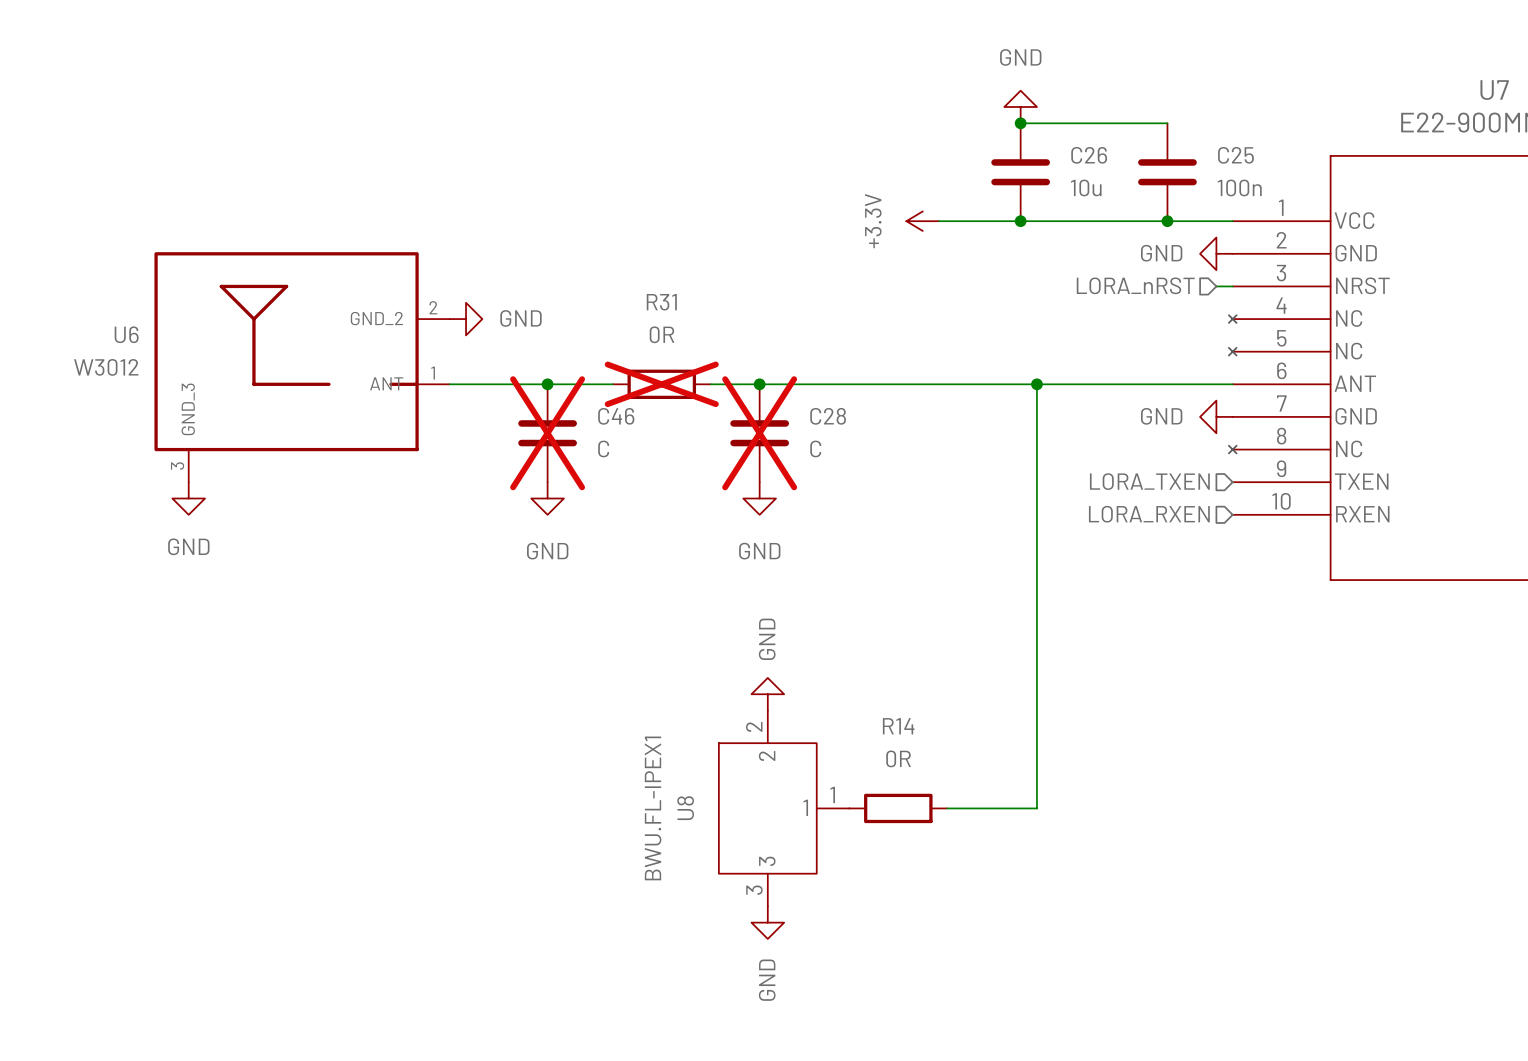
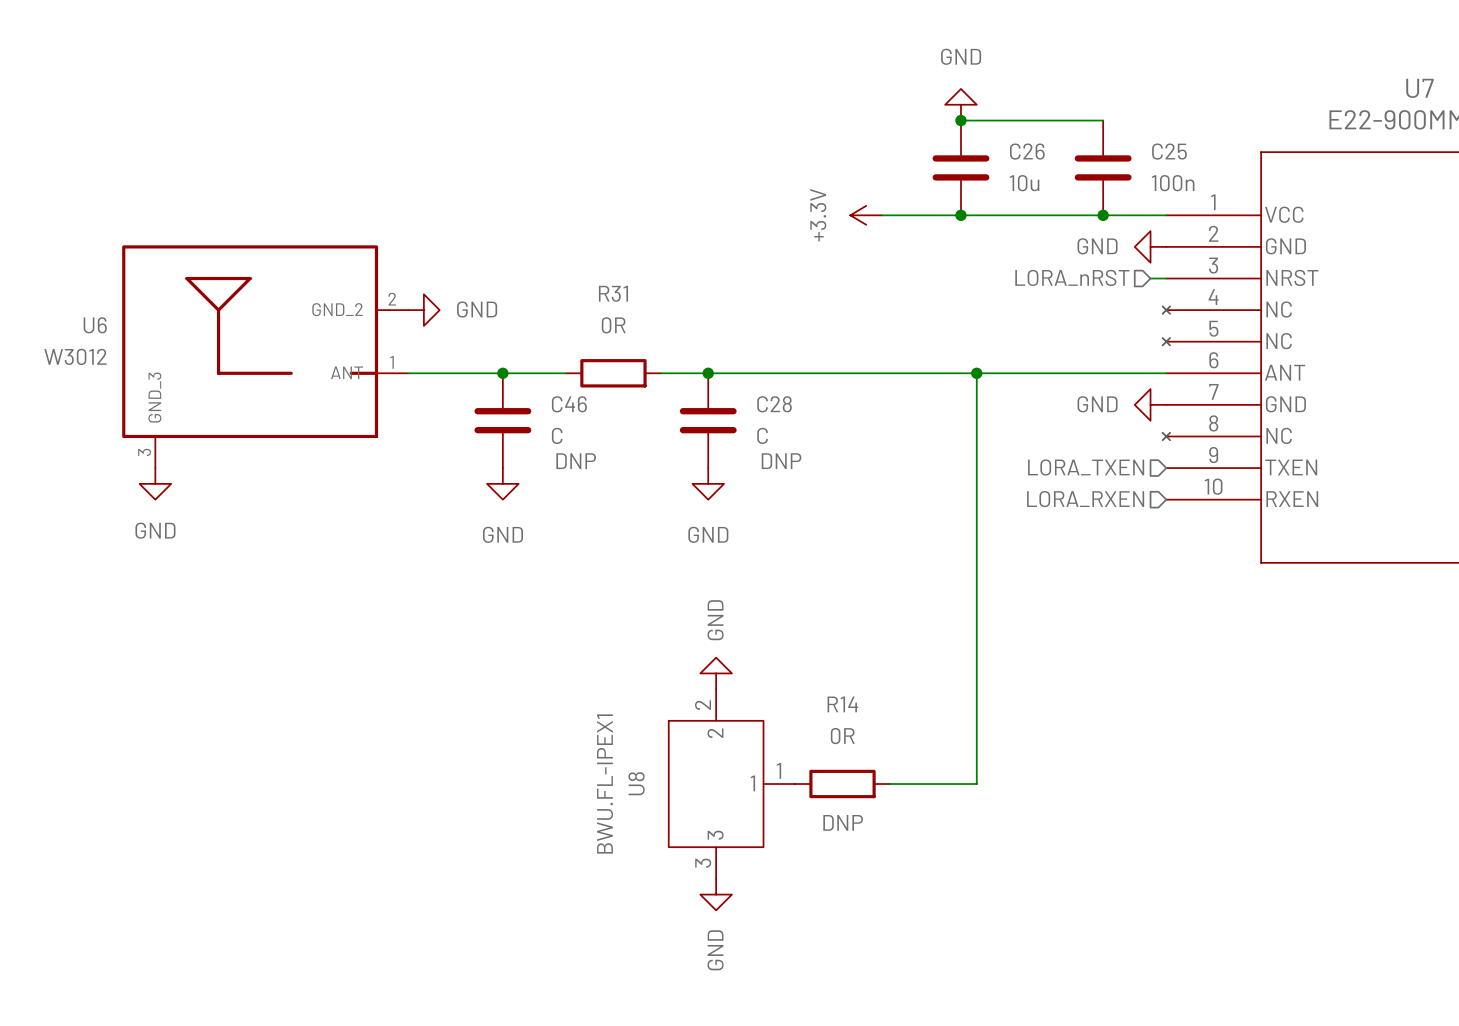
R31 do-not-place cross: (661, 384) -> none
C46 do-not-place cross: (547, 433) -> none
C28 do-not-place cross: (759, 433) -> none
C46 text: none -> DNP (576, 461)
C28 text: none -> DNP (781, 461)
R14 text: none -> DNP (843, 822)

